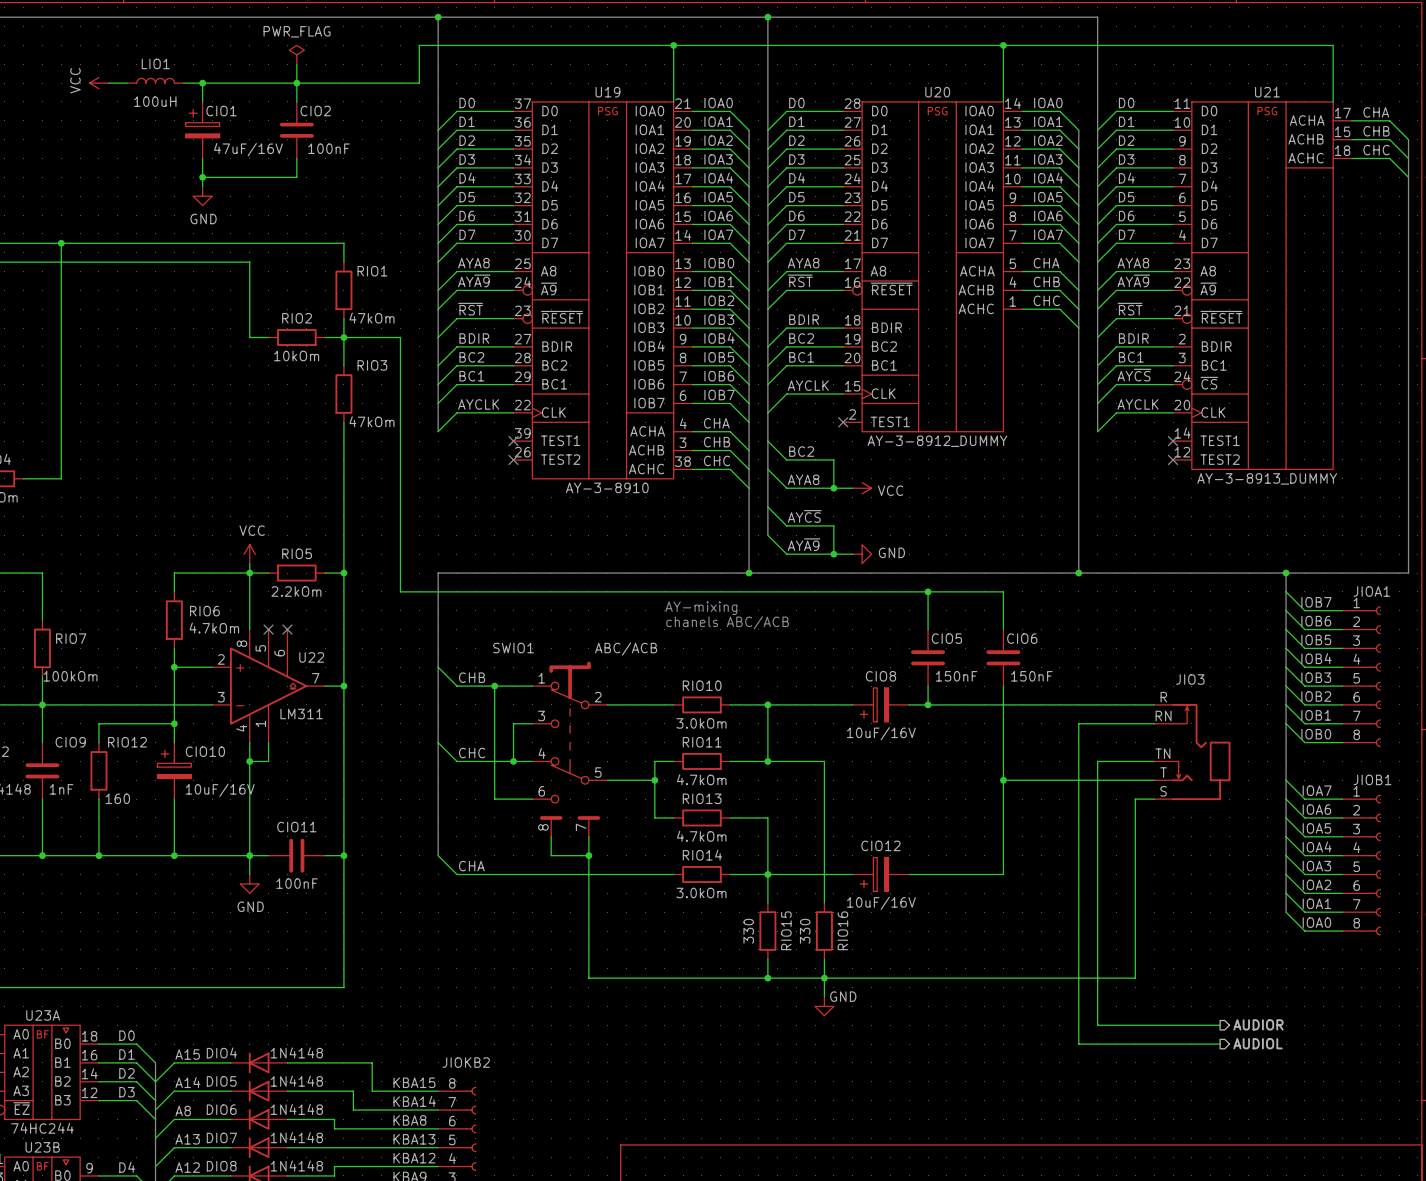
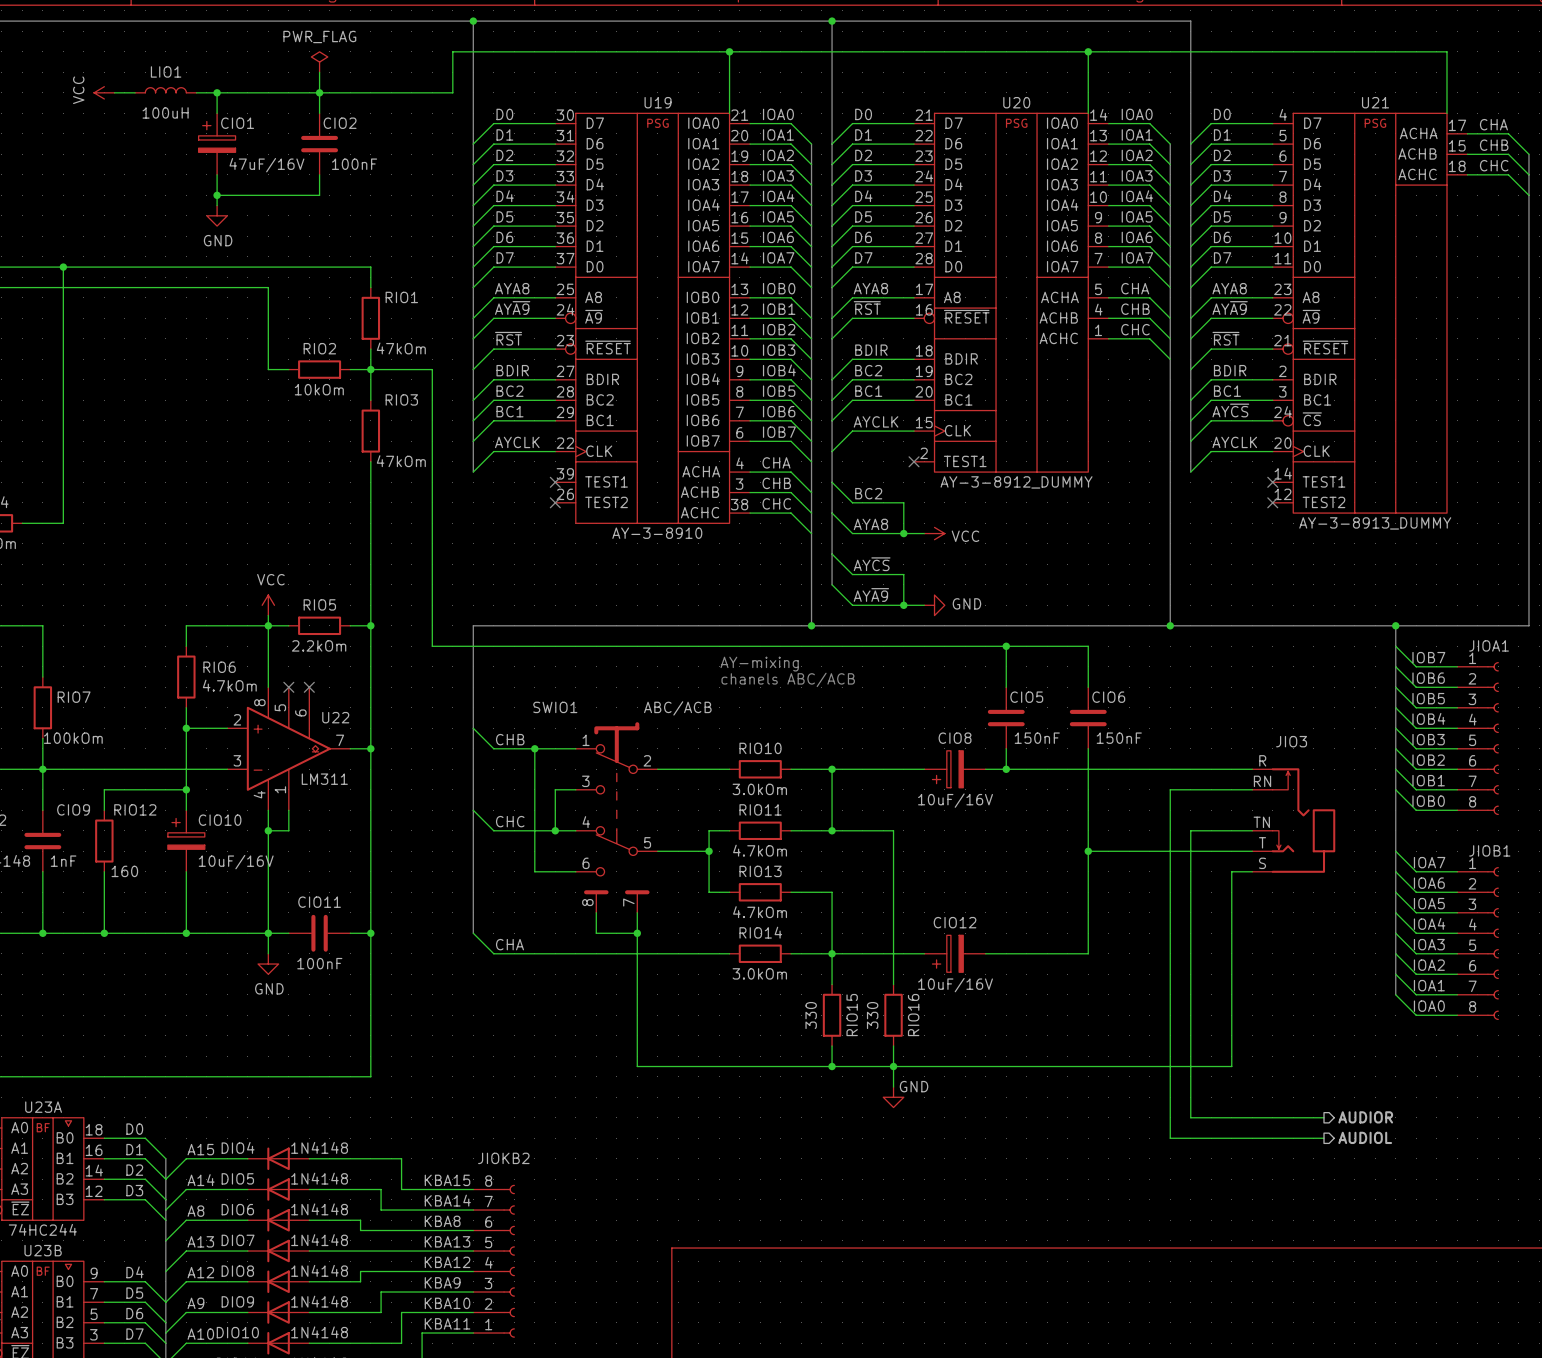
U19 symbol: [513, 101, 693, 479] -> [555, 113, 751, 524]
U20 symbol: [843, 101, 1023, 432] -> [914, 113, 1109, 473]
U21 symbol: [1173, 101, 1353, 470] -> [1272, 113, 1468, 514]

